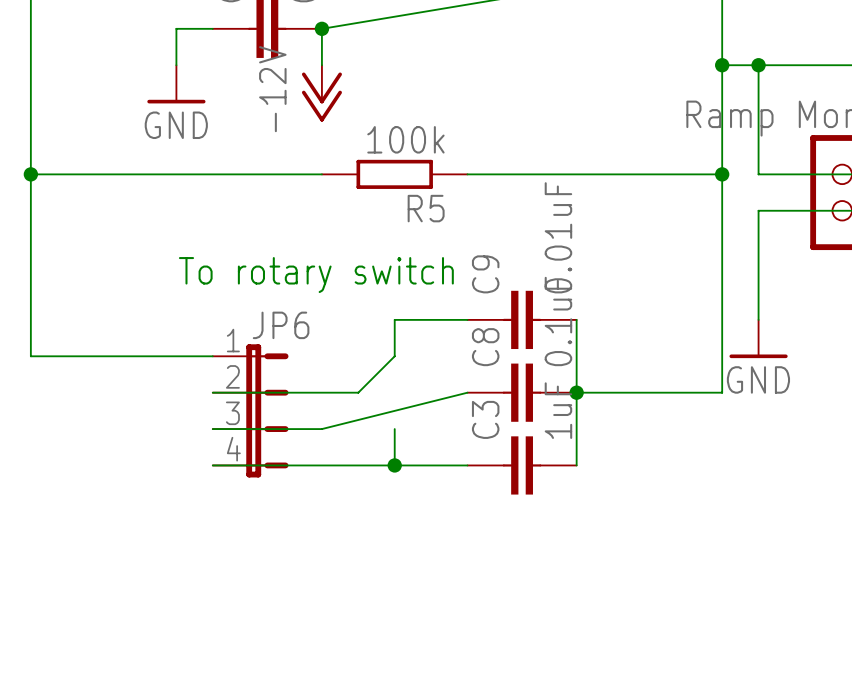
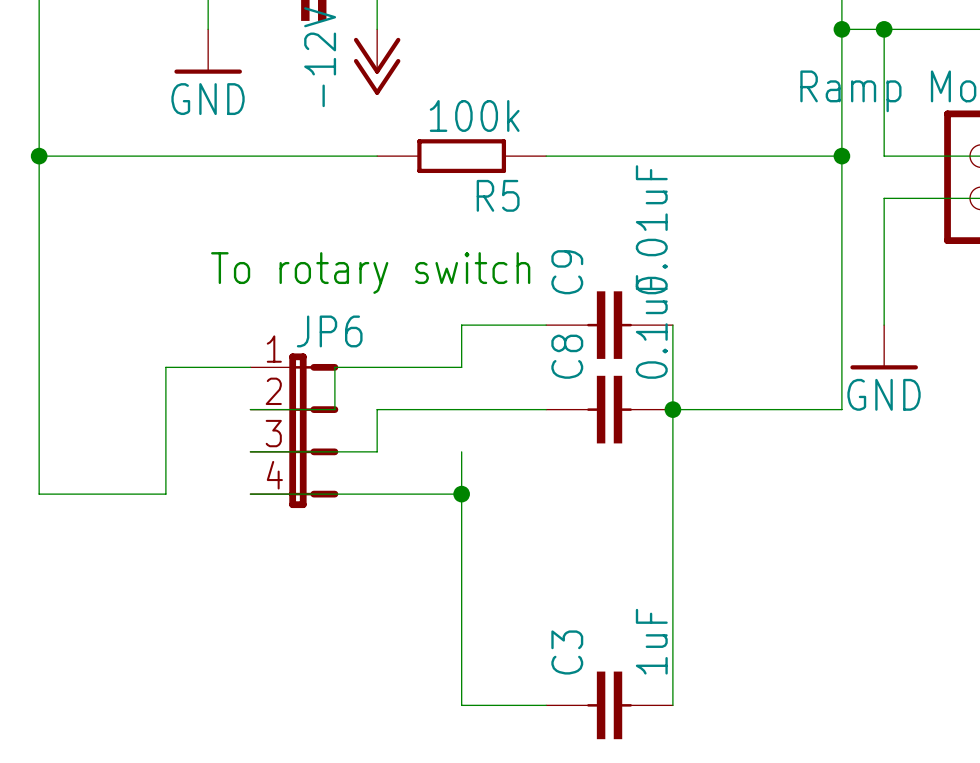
wire: (30, 356) (140, 356) -> (39, 367) (39, 494) (165, 494) (165, 367)
wire: (394, 356) (358, 392) -> (461, 367) (334, 367) (334, 409)
wire: (285, 392) (321, 392) -> (377, 451) (377, 409)
wire: (467, 392) (321, 429) -> (546, 409) (419, 409)
wire: (394, 465) (467, 465) -> (461, 494) (461, 705) (546, 705)
C3 position: (522, 465) -> (609, 705)
wire: none -> (672, 494) (672, 705)

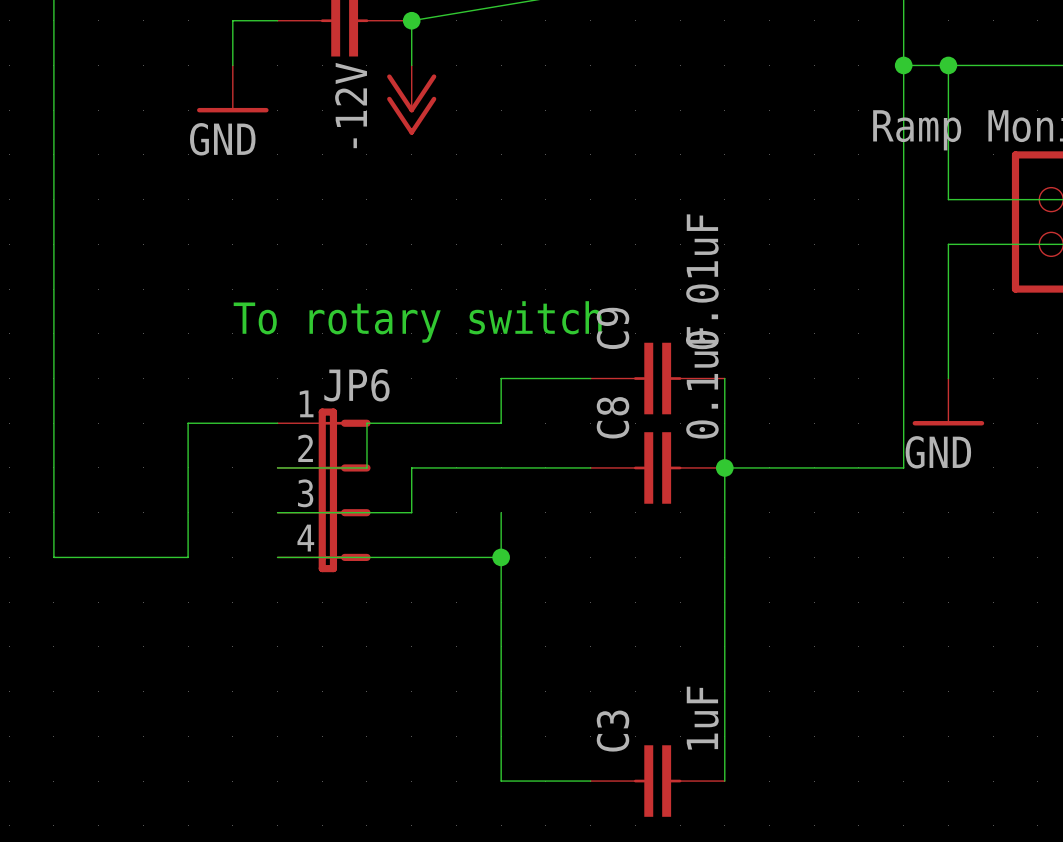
wire: (39, 156) (377, 156) -> none
junction: (39, 156) -> none
R5: 100k (461, 156) -> none
wire: (546, 156) (841, 156) -> none
junction: (841, 156) -> none

